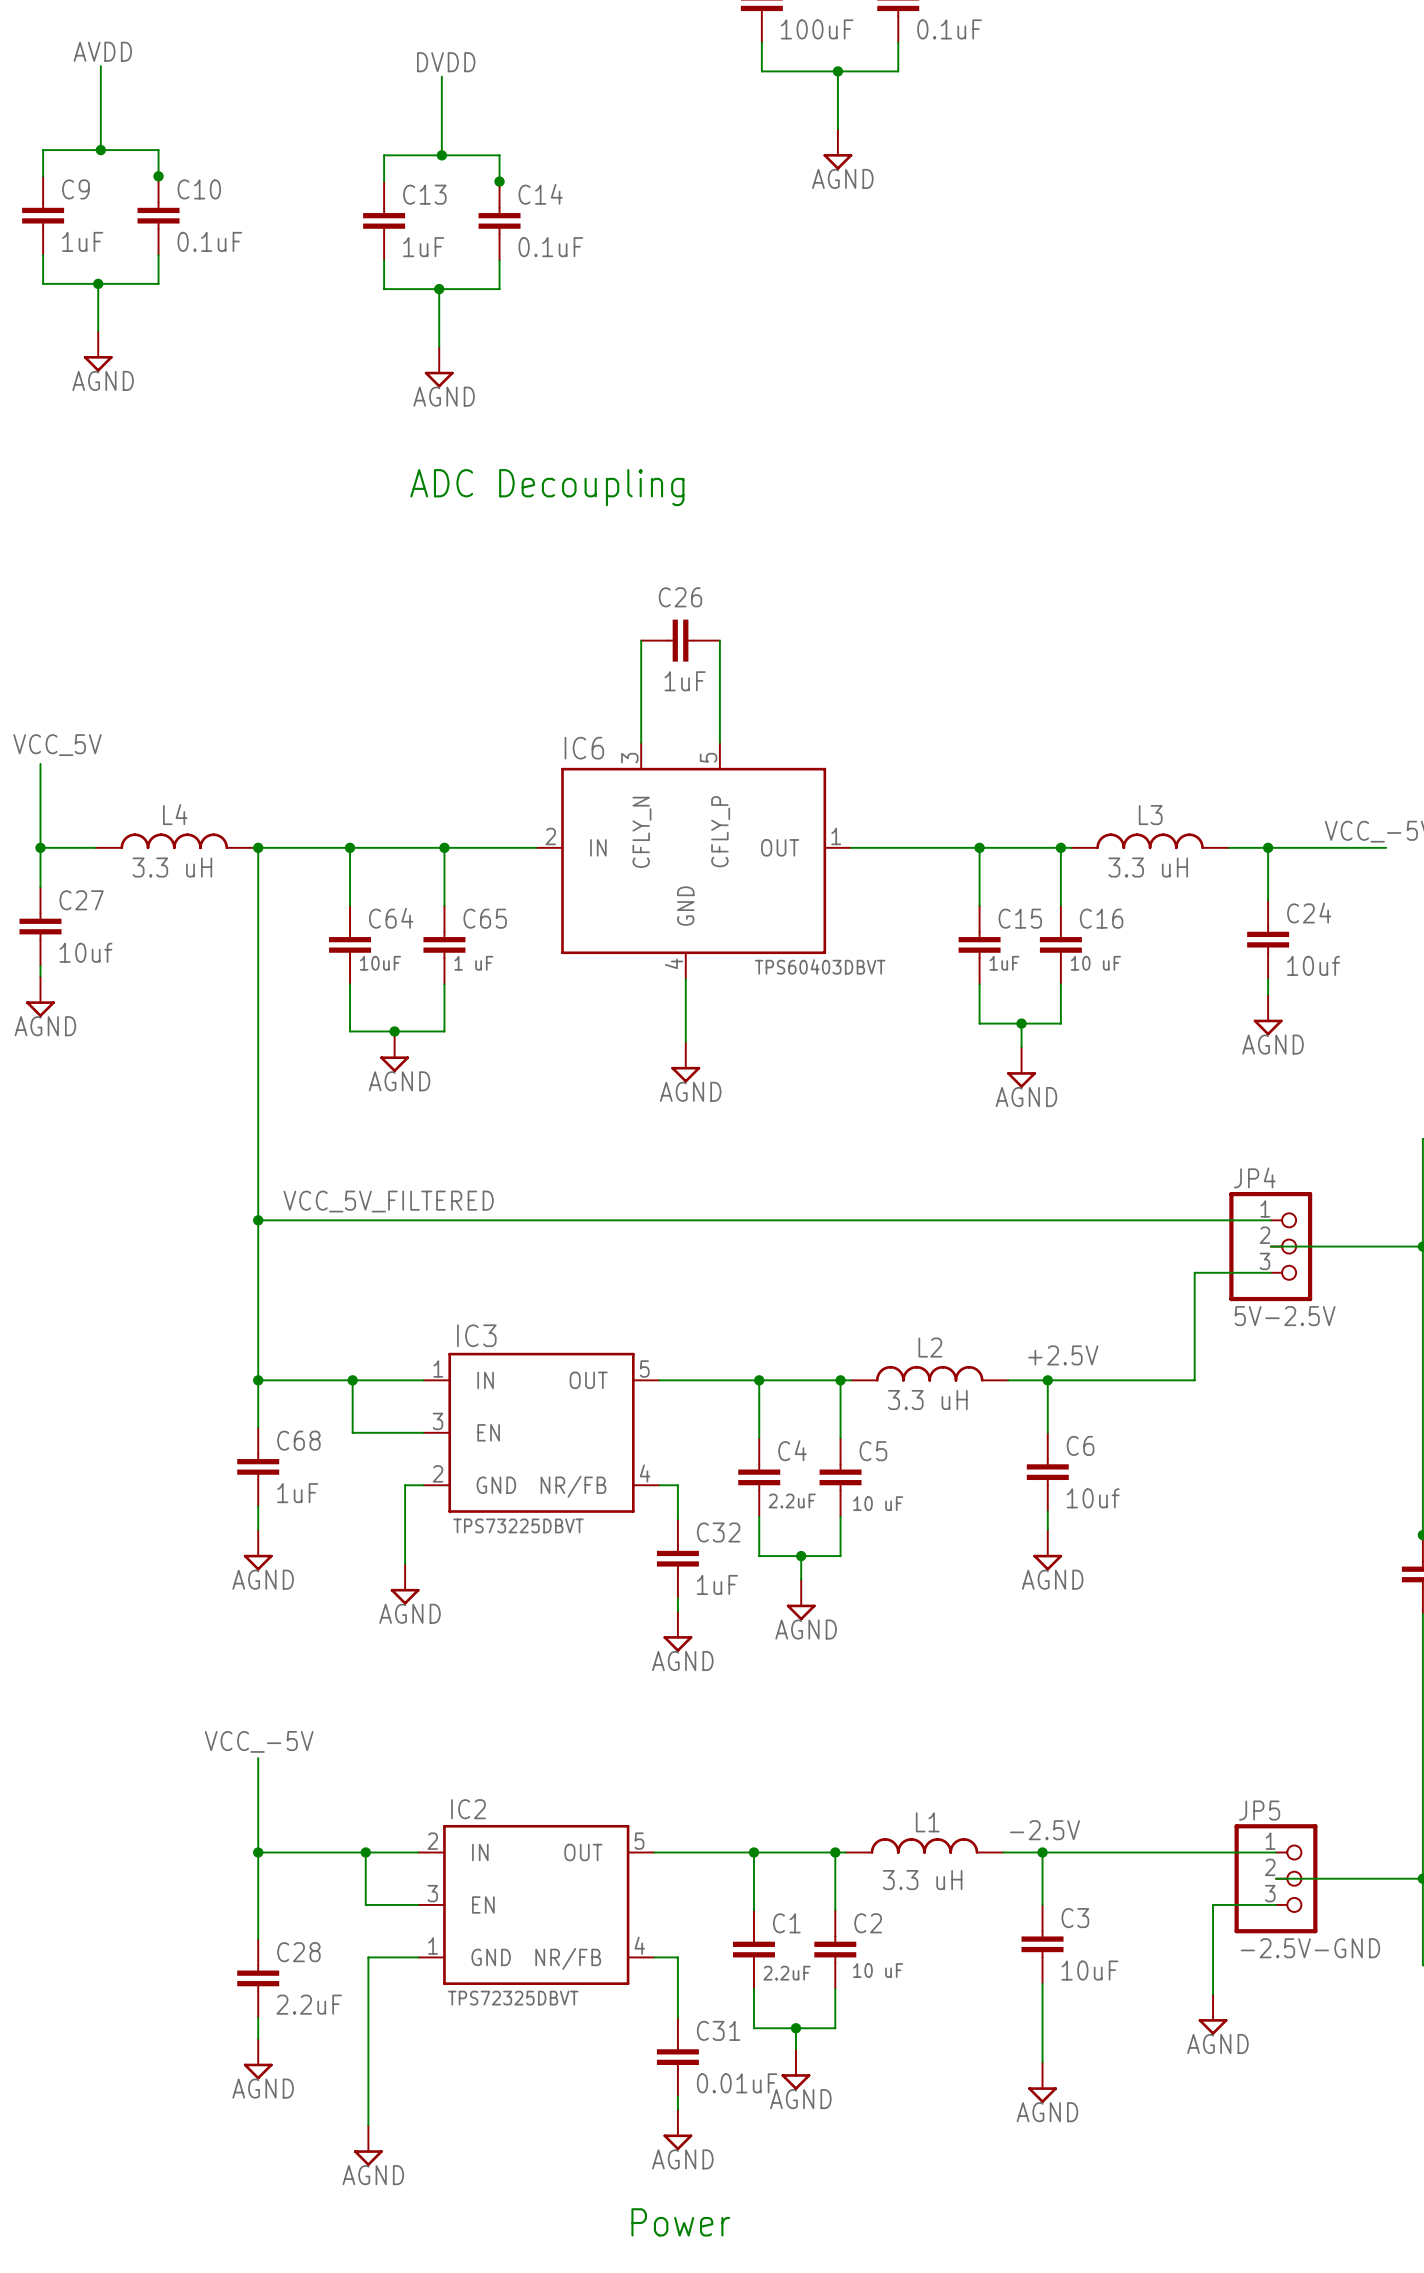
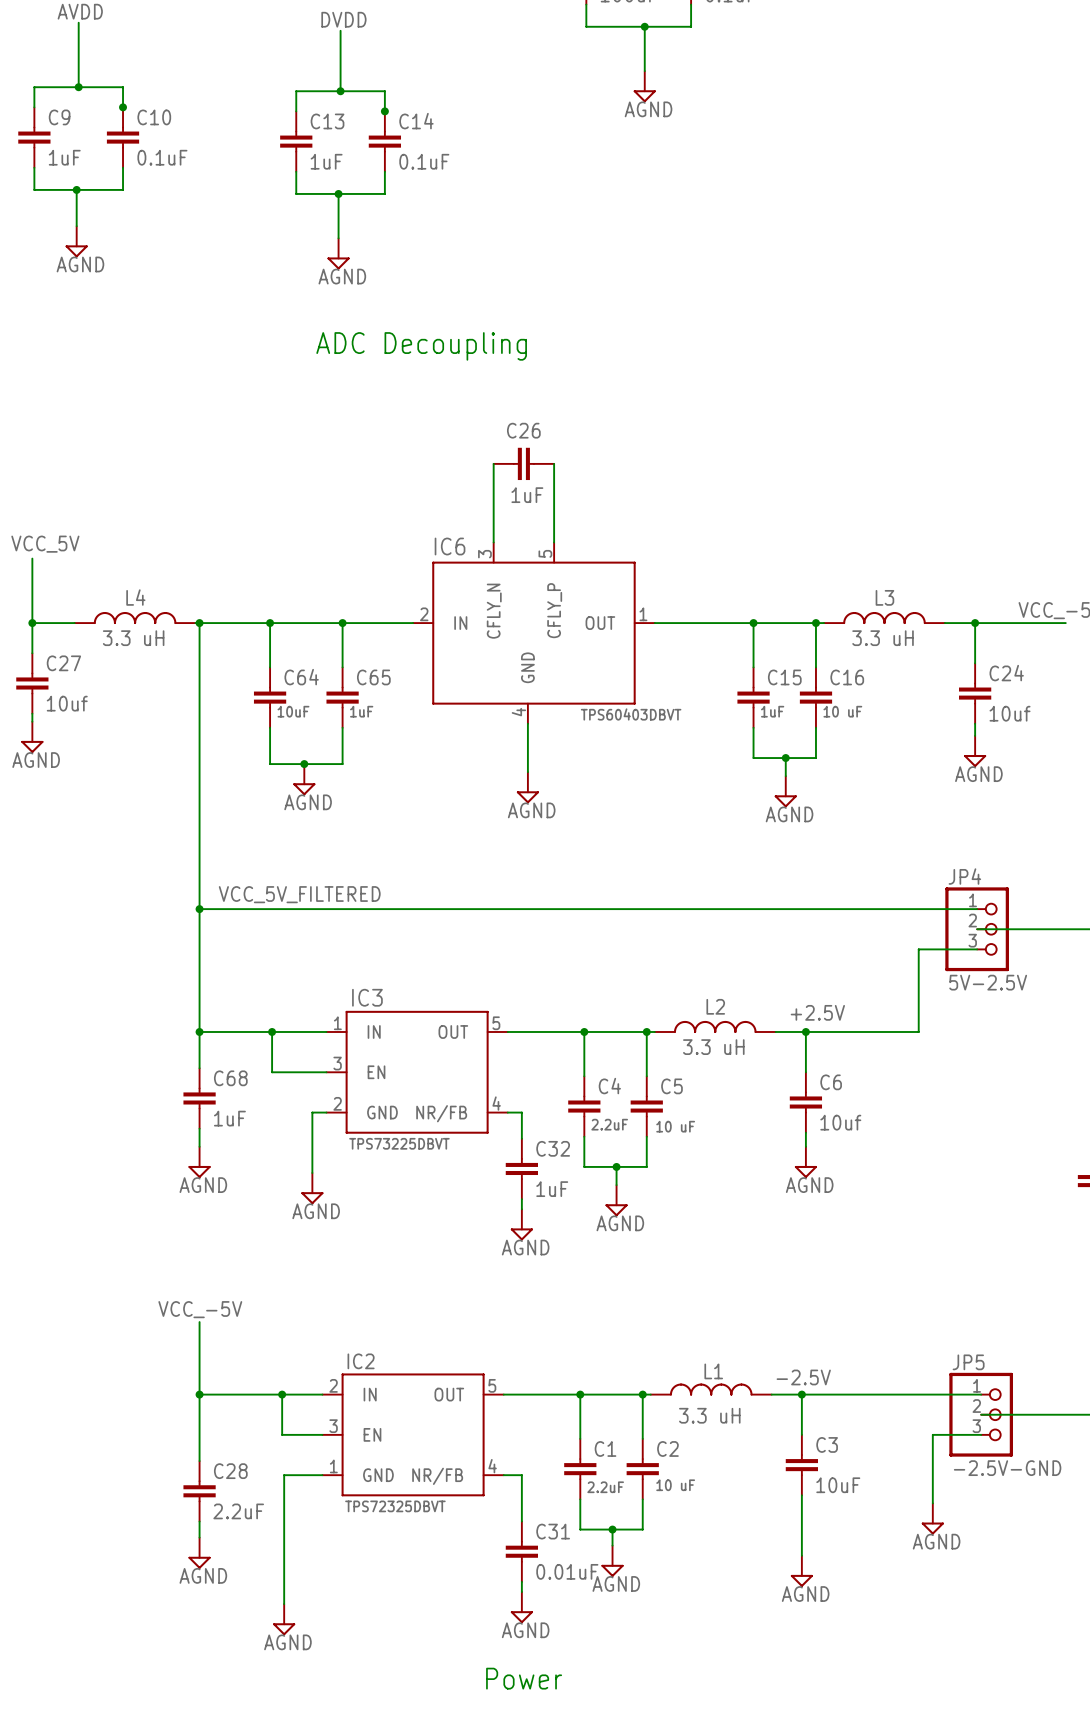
C65 value: 1 uF (473, 963) -> 1uF (361, 711)

